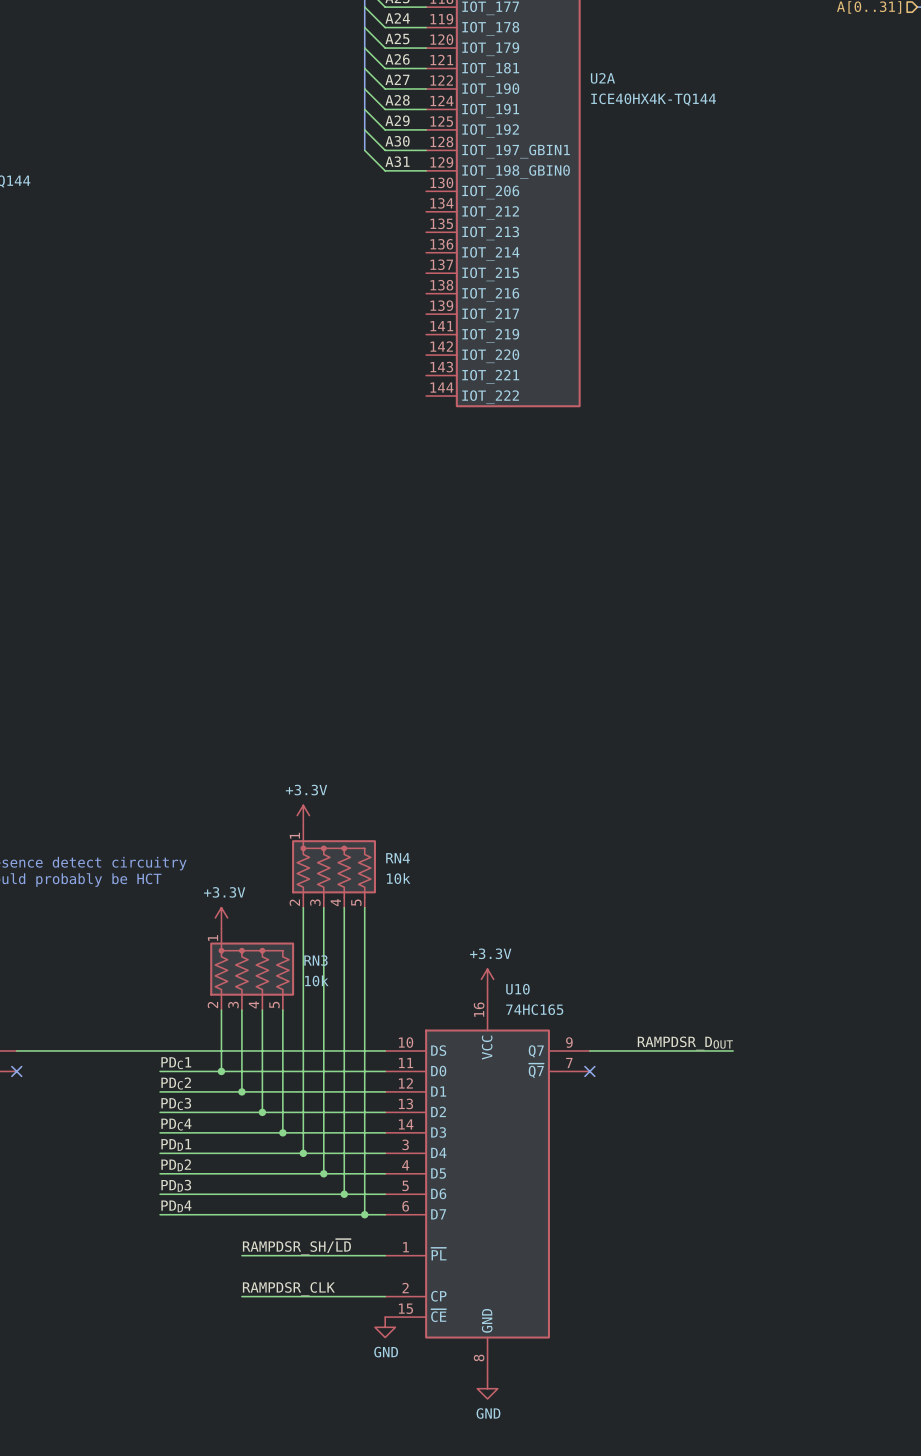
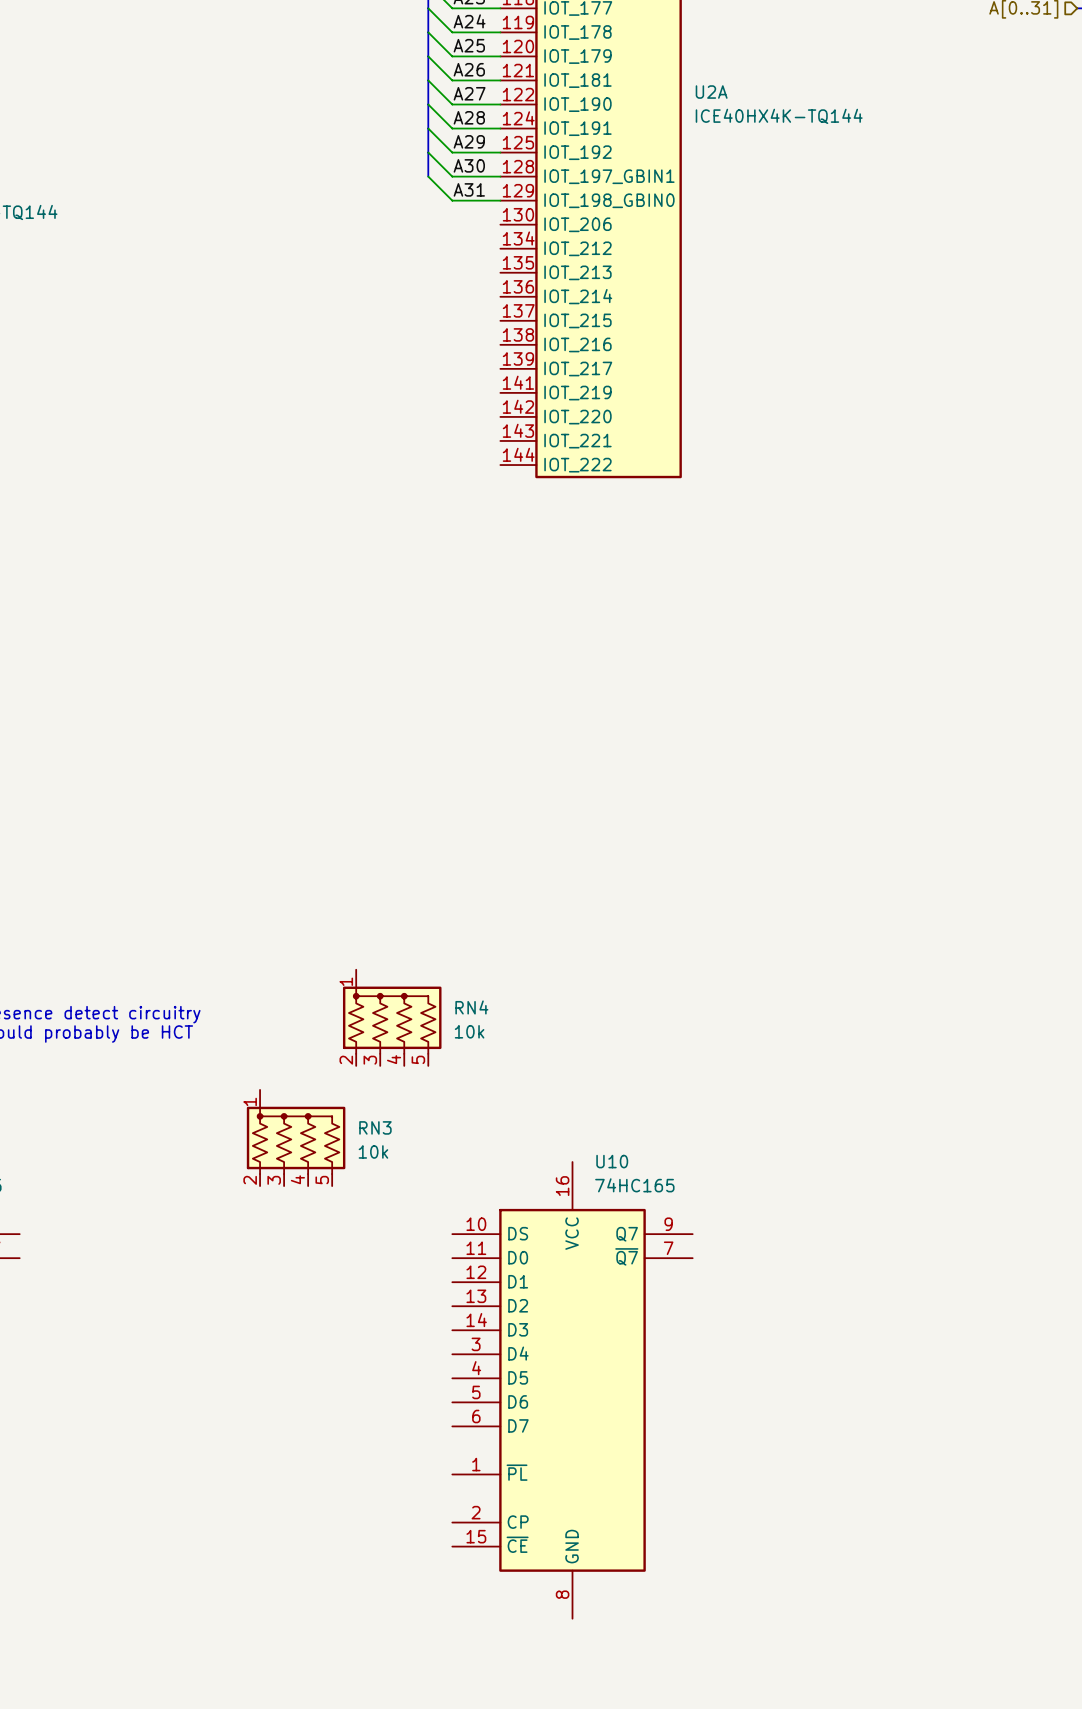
power symbol: +3.3V (303, 815) -> none
wire: (303, 907) (303, 1153) -> none
wire: (323, 907) (323, 1173) -> none
wire: (344, 907) (344, 1194) -> none
wire: (364, 907) (364, 1214) -> none
power symbol: +3.3V (221, 917) -> none
power symbol: +3.3V (487, 979) -> none
wire: (221, 1010) (221, 1071) -> none
wire: (241, 1010) (241, 1091) -> none
wire: (262, 1010) (262, 1112) -> none
wire: (282, 1010) (282, 1132) -> none
label: RAMPDSR_DOUT (685, 1043) -> none
wire: (16, 1050) (385, 1050) -> none
wire: (589, 1050) (733, 1050) -> none
label: PDC1 (176, 1063) -> none
no-connect mark: (16, 1071) -> none
wire: (160, 1071) (385, 1071) -> none
junction: (221, 1071) -> none
no-connect mark: (589, 1071) -> none
label: PDC2 (176, 1083) -> none
wire: (160, 1091) (385, 1091) -> none
junction: (241, 1091) -> none
label: PDC3 (176, 1104) -> none
wire: (160, 1112) (385, 1112) -> none
junction: (262, 1112) -> none
label: PDC4 (176, 1124) -> none
wire: (160, 1132) (385, 1132) -> none
junction: (282, 1132) -> none
label: PDD1 (176, 1144) -> none
wire: (160, 1153) (385, 1153) -> none
junction: (303, 1153) -> none
label: PDD2 (176, 1165) -> none
wire: (160, 1173) (385, 1173) -> none
junction: (323, 1173) -> none
label: PDD3 (176, 1185) -> none
wire: (160, 1194) (385, 1194) -> none
junction: (344, 1194) -> none
label: PDD4 (176, 1206) -> none
wire: (160, 1214) (385, 1214) -> none
junction: (364, 1214) -> none
label: RAMPDSR_SH/~{LD} (296, 1247) -> none
wire: (241, 1255) (385, 1255) -> none
label: RAMPDSR_CLK (288, 1289) -> none
wire: (241, 1296) (385, 1296) -> none
power symbol: GND (385, 1327) -> none
power symbol: GND (487, 1388) -> none

